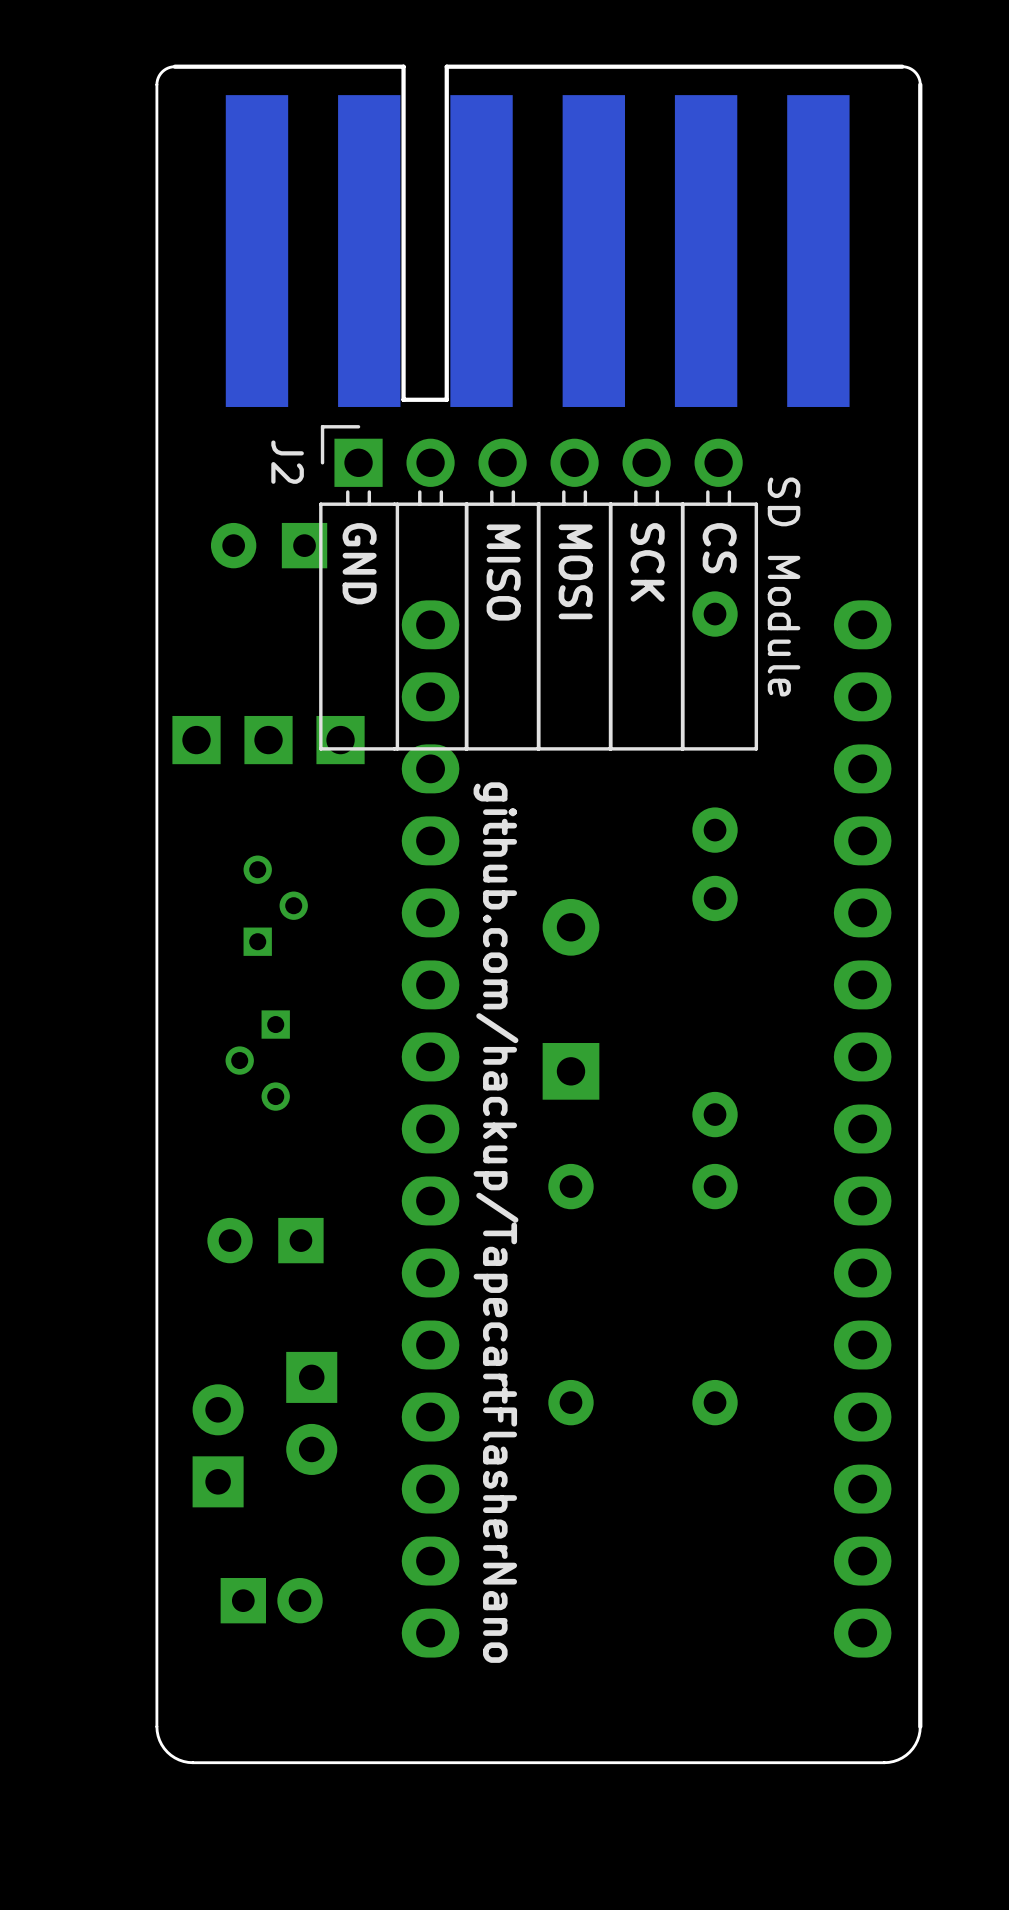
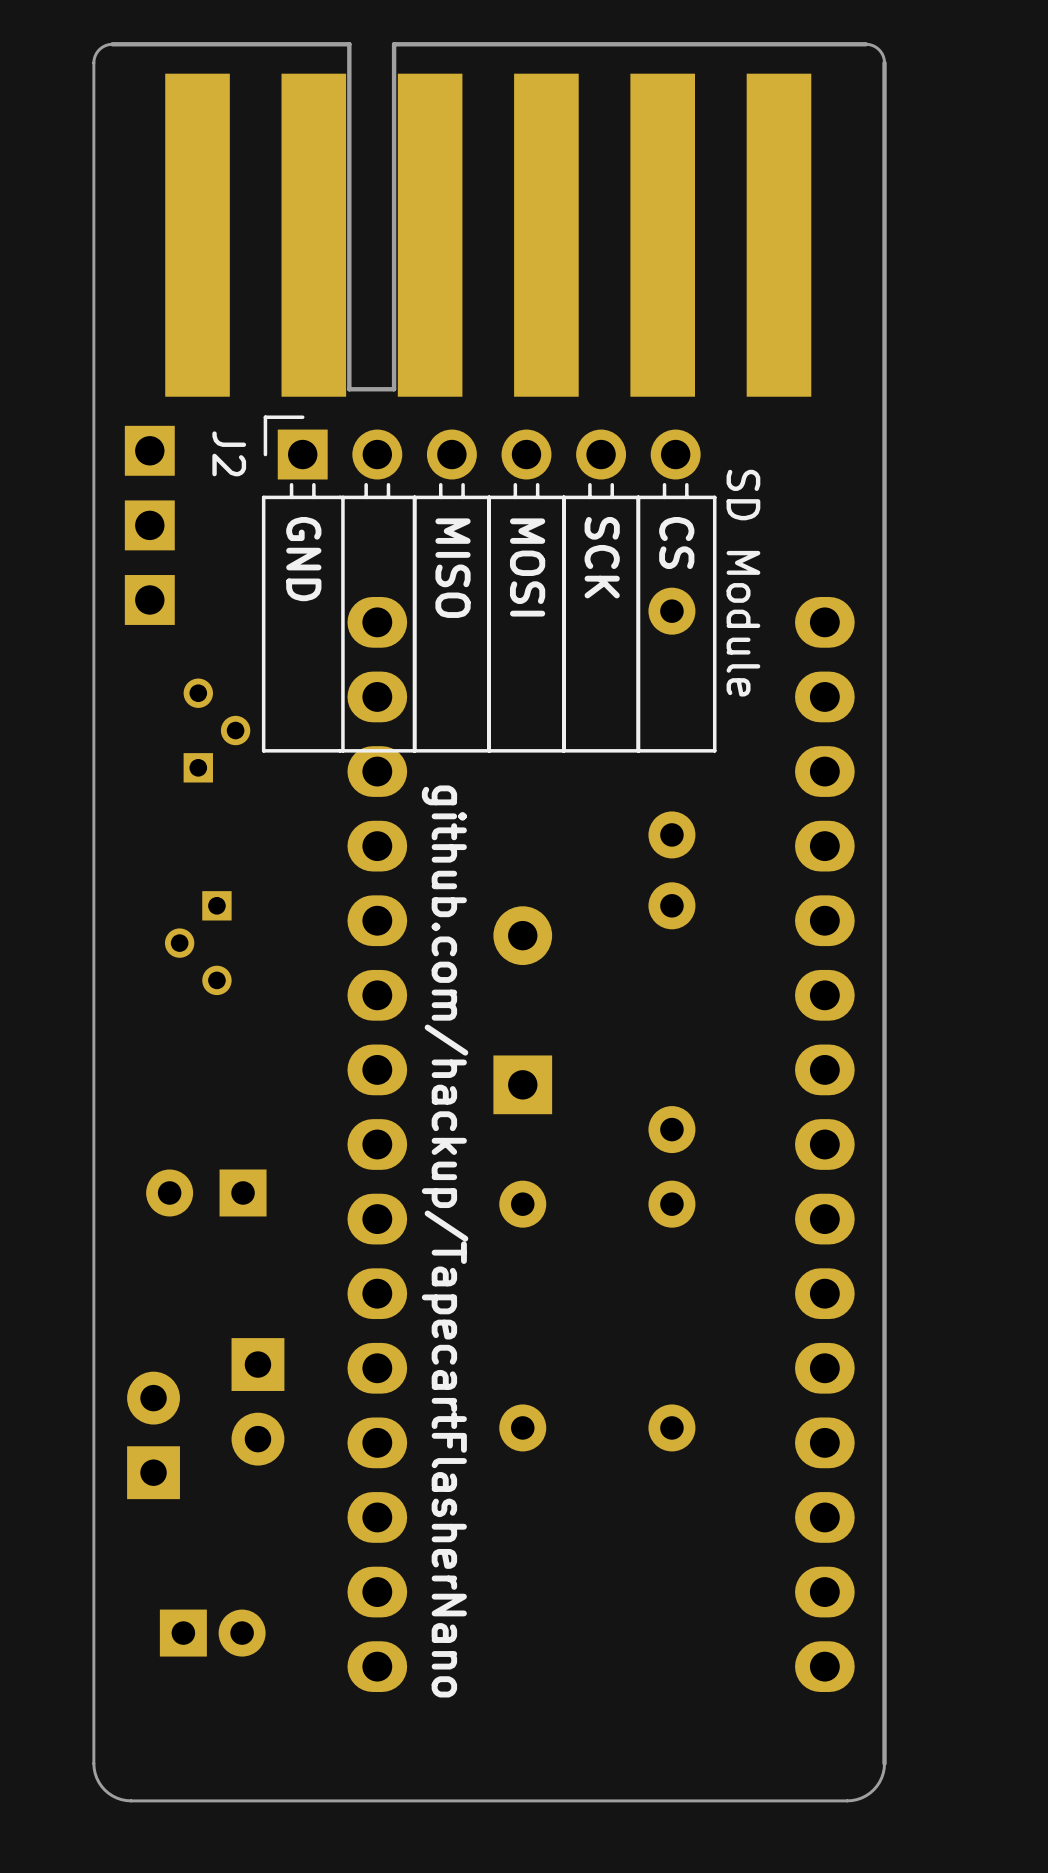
part: none -> (149, 525)
part: (269, 545) -> none
part footprint: [172, 715, 365, 765] -> [183, 678, 251, 783]
part rotation: 0° (275, 905) -> 180° (198, 943)
part: (257, 1060) -> none
part position: (265, 1240) -> (206, 1192)
part position: (311, 1413) -> (257, 1401)
part position: (218, 1445) -> (153, 1435)

